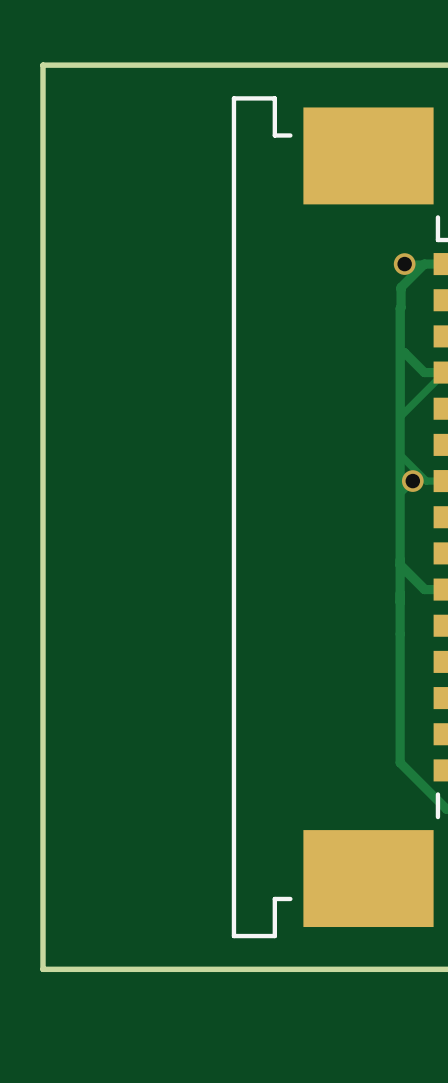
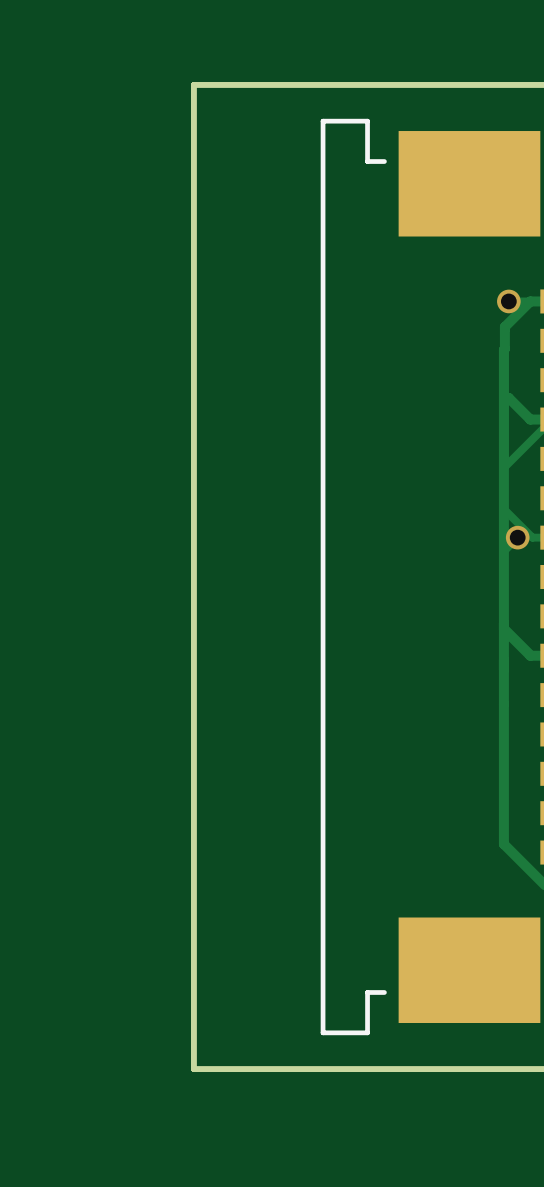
board edge: (115, 65) (42, 65) (42, 969) (115, 969) -> (193, 84) (193, 1069)

